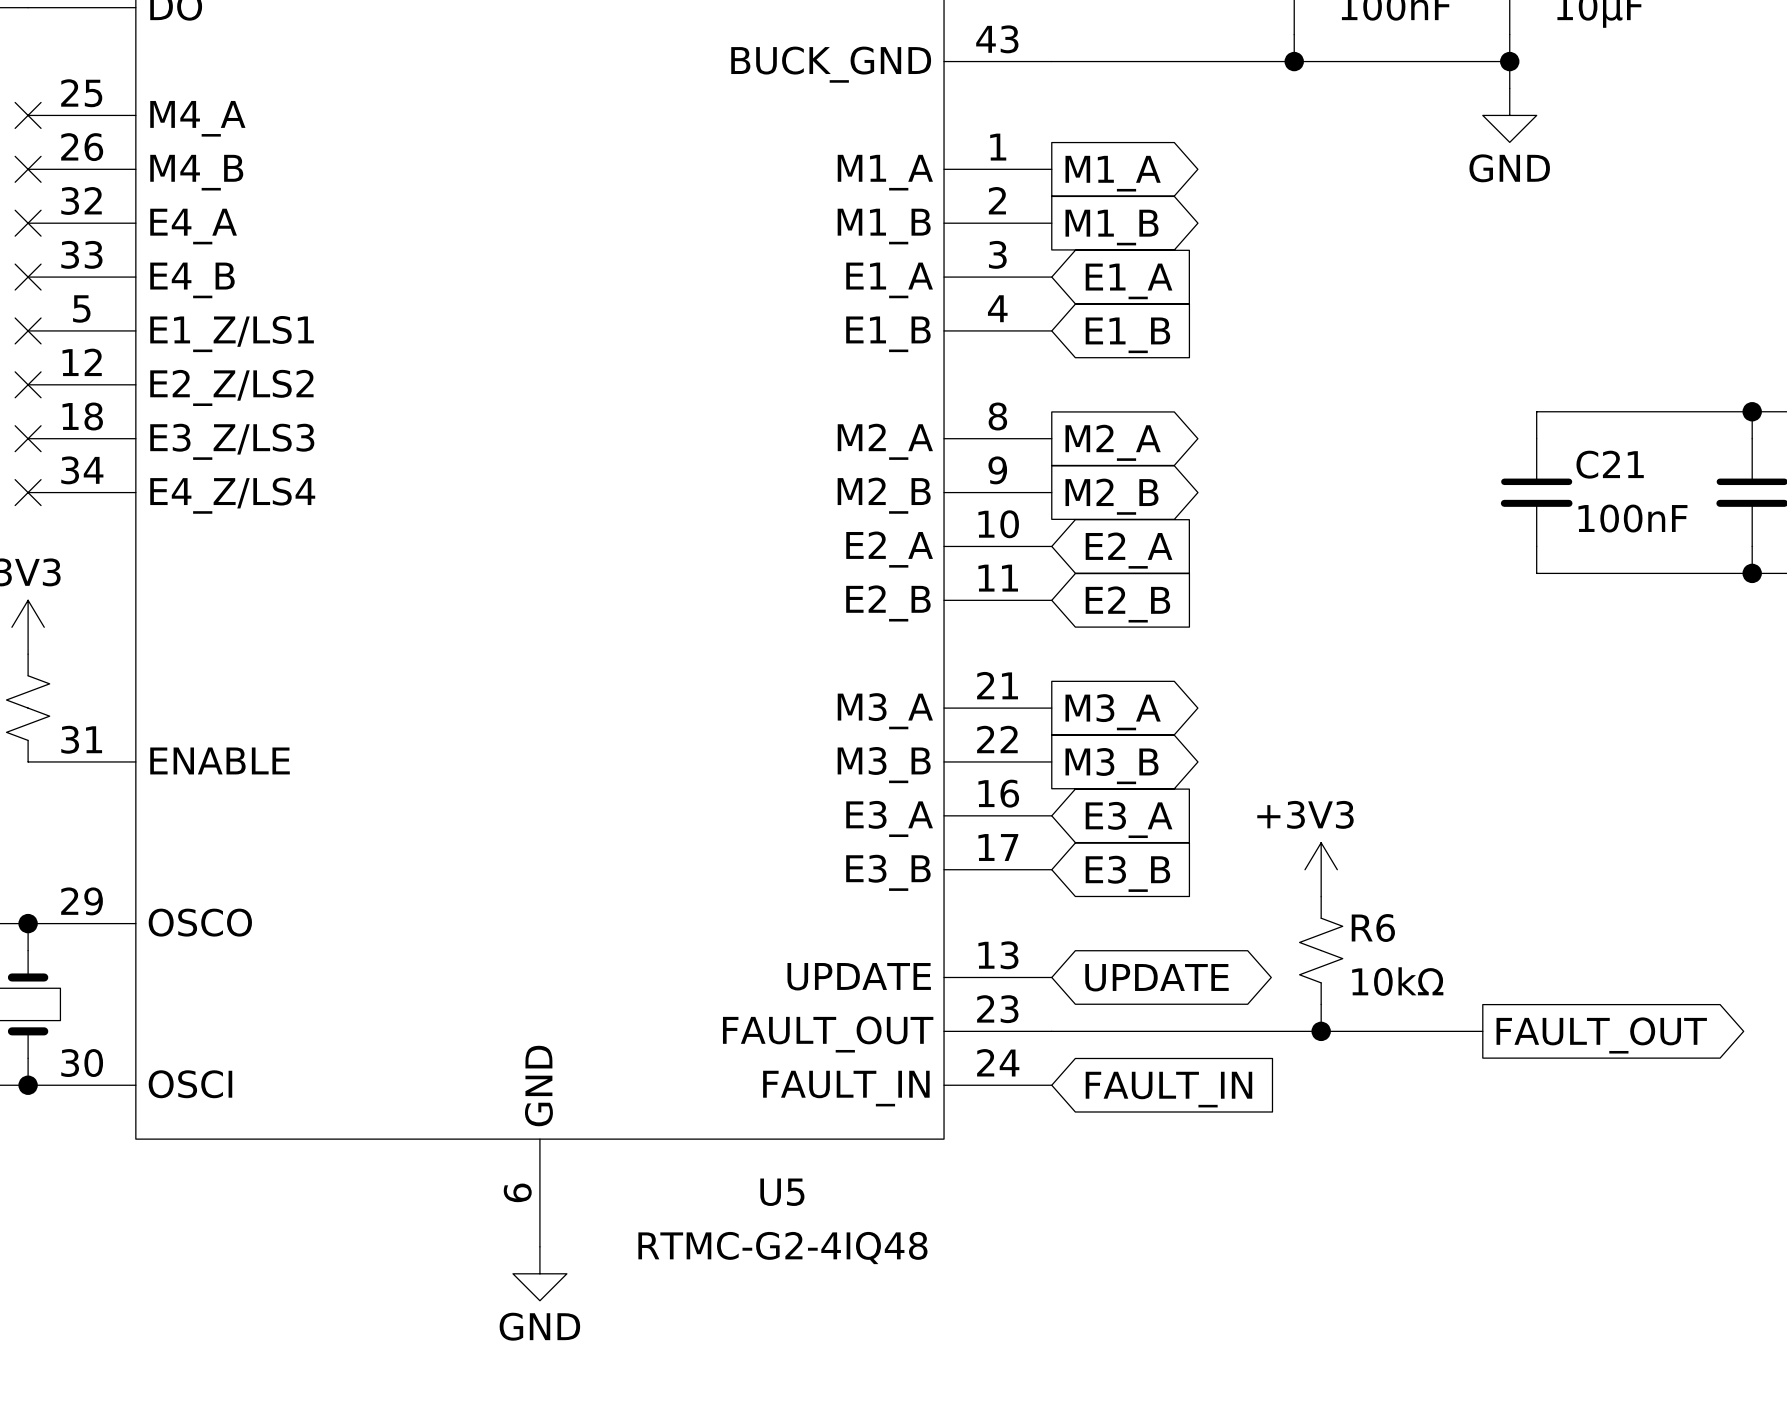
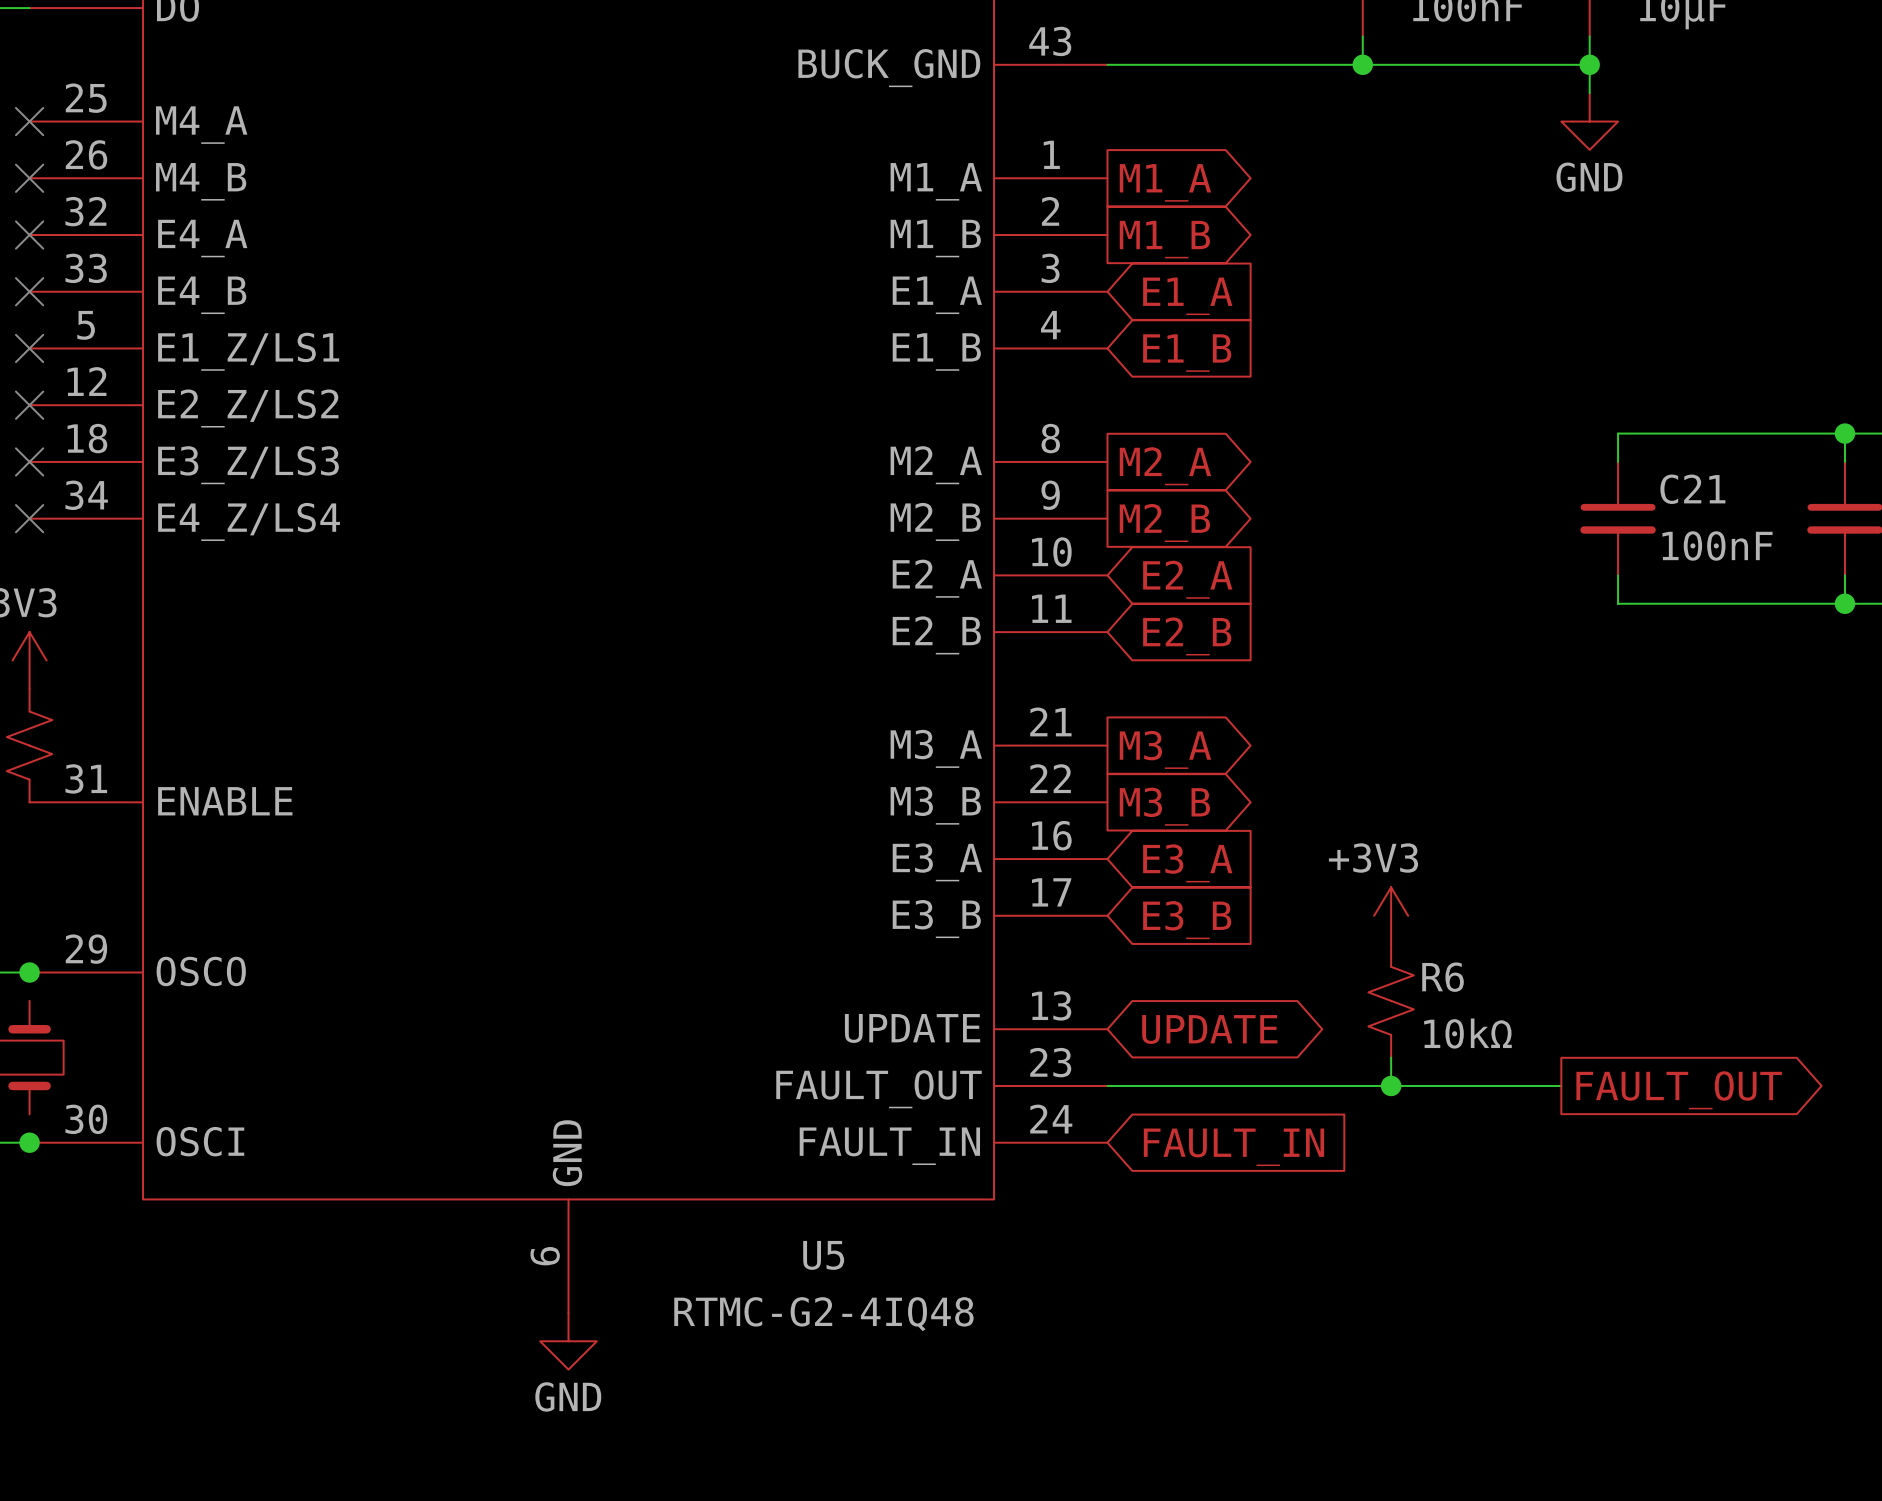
wire: (28, 923) (28, 950) -> none
wire: (28, 1058) (28, 1085) -> none

